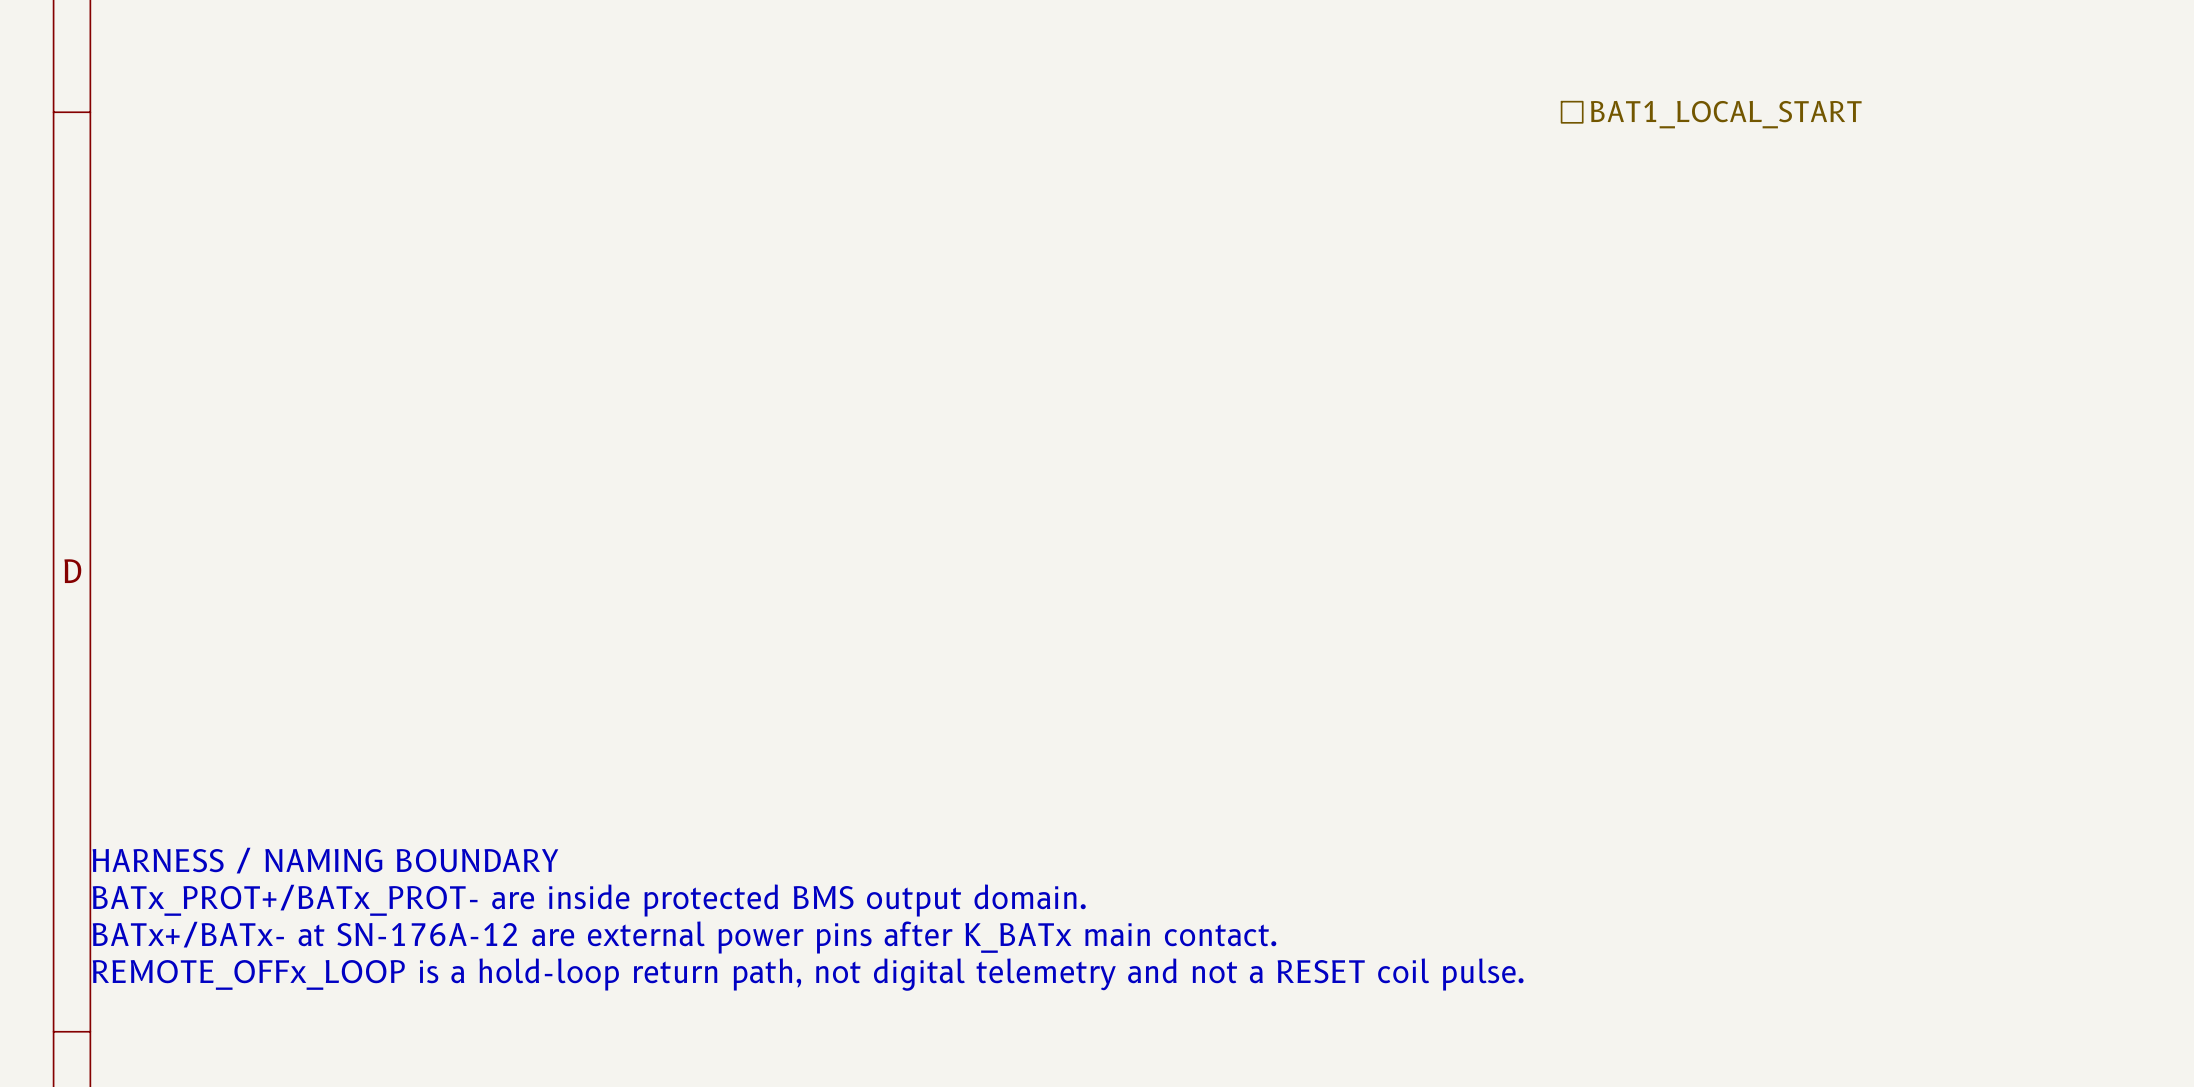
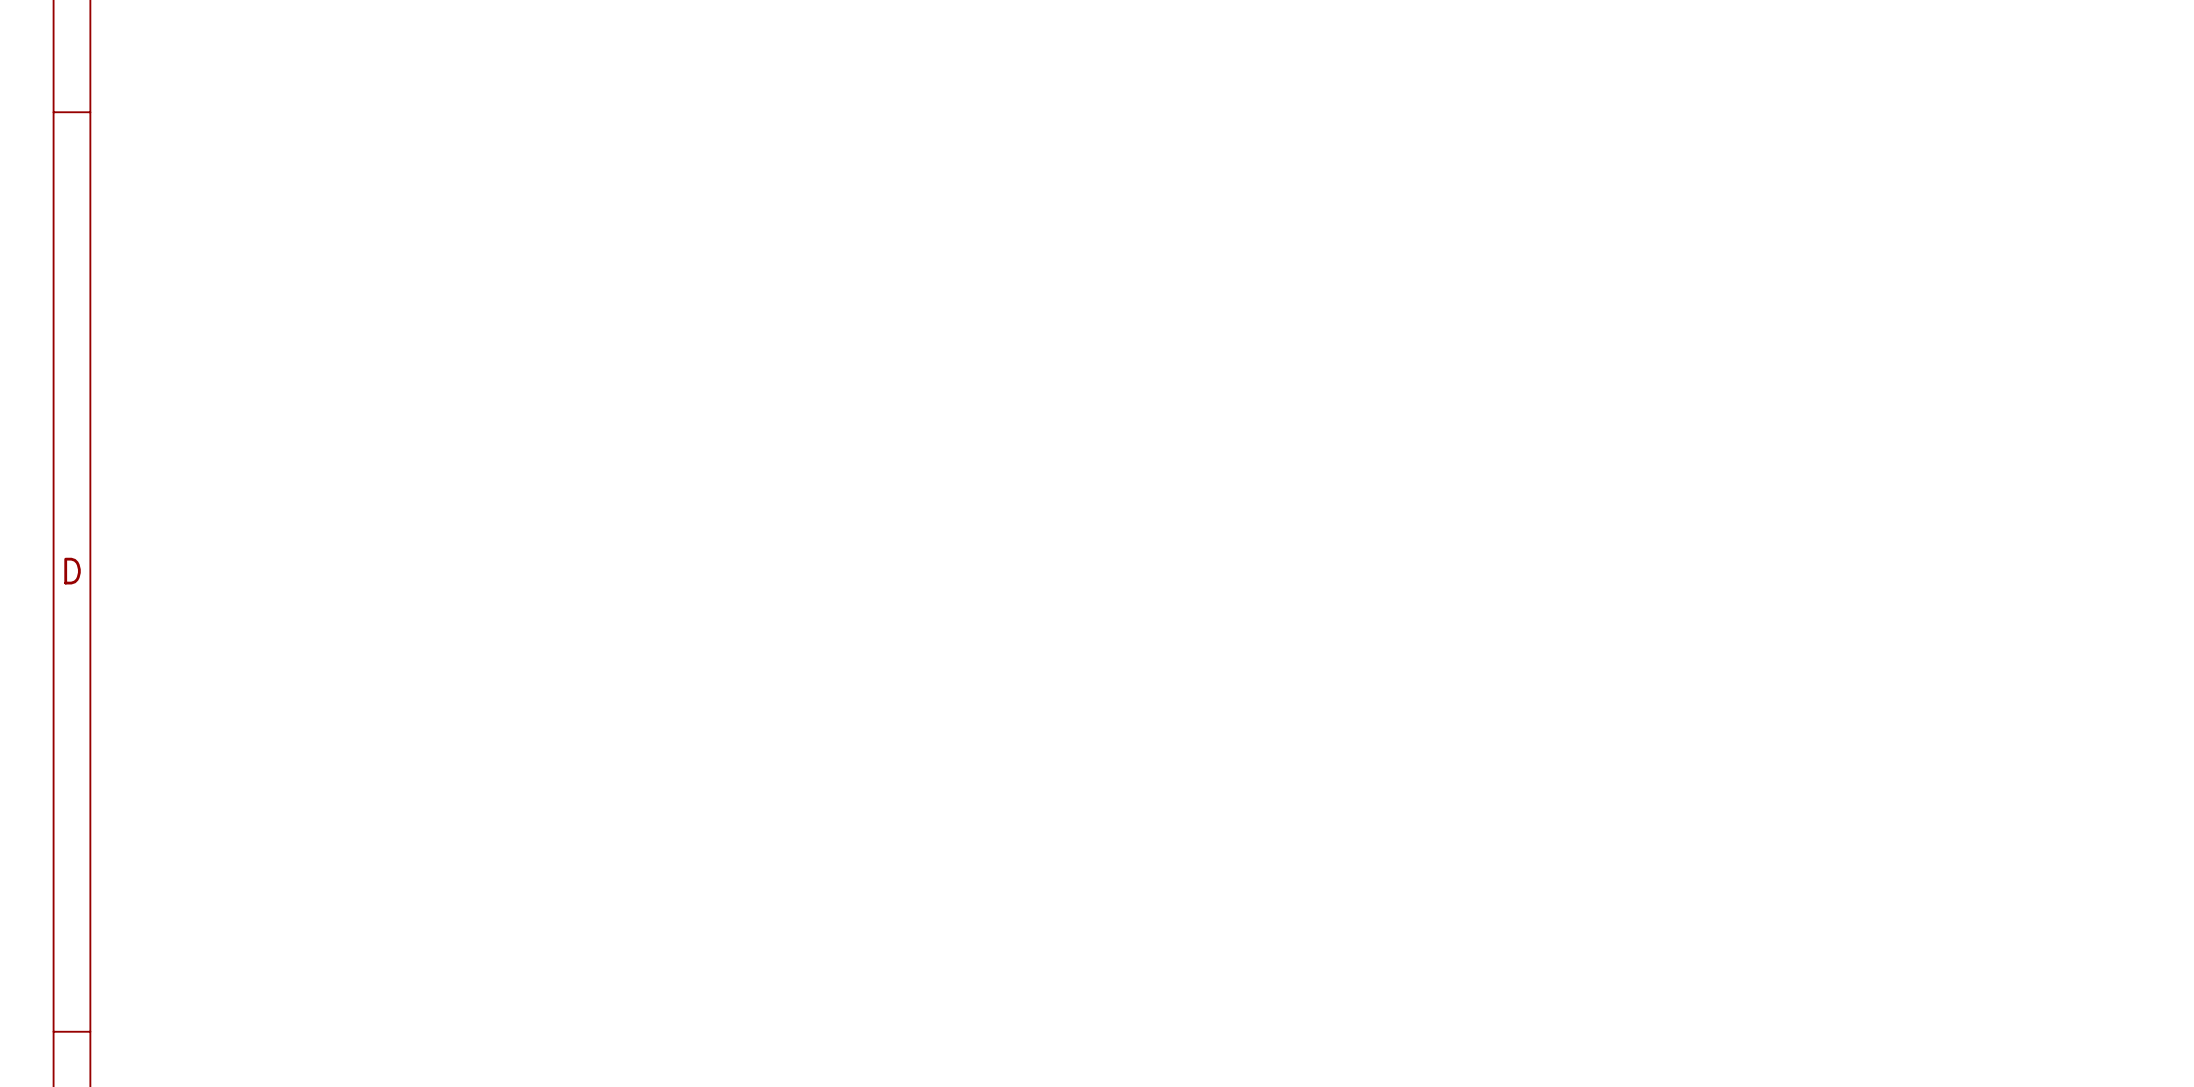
hierarchical label: BAT1_LOCAL_START (1726, 114) -> none
text: HARNESS / NAMING BOUNDARY (325, 860) -> none
text: BATx_PROT+/BATx_PROT- are inside protected BMS output domain. (589, 900) -> none
text: BATx+/BATx- at SN-176A-12 are external power pins after K_BATx main contact. (684, 937) -> none
text: REMOTE_OFFx_LOOP is a hold-loop return path, not digital telemetry and not a RESET coil pulse. (808, 974) -> none

